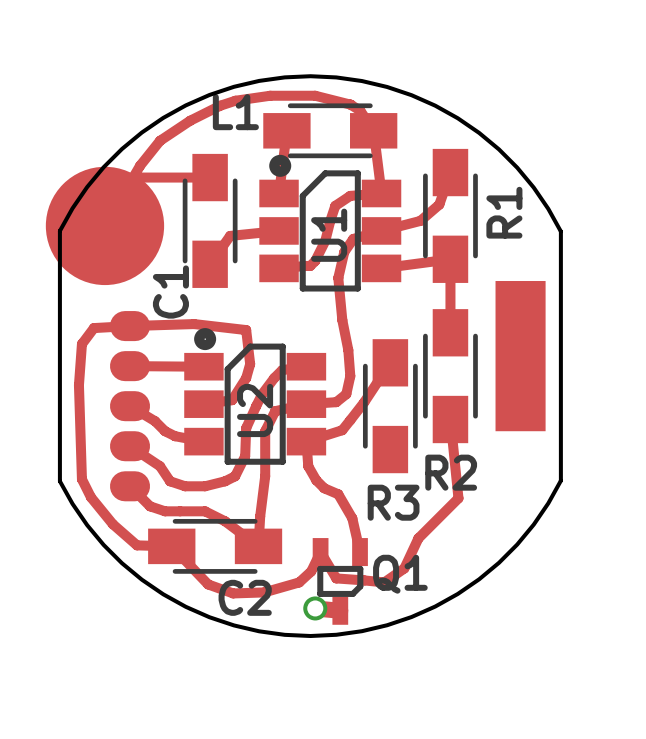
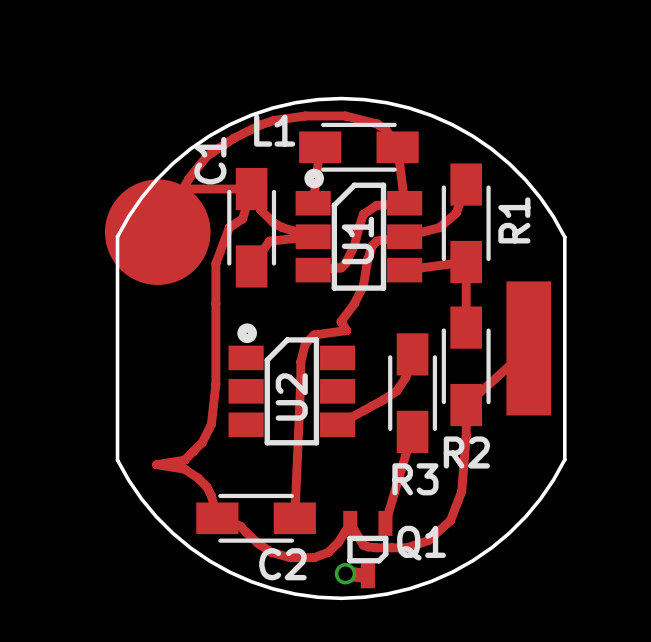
track: none -> (313, 236) (273, 223) (260, 209) (251, 189) (242, 218) (229, 227) (215, 263) (215, 384) (211, 424) (202, 442) (184, 460) (156, 464) (184, 469) (197, 478) (206, 487) (211, 495) (217, 518) (240, 526) (257, 543) (271, 552) (290, 557) (314, 557) (328, 552) (338, 542) (350, 523) (363, 545) (367, 546) (407, 547) (428, 540) (450, 520) (461, 491) (466, 435) (466, 405) (528, 348)
track: (381, 230) (353, 238) (344, 251) (338, 278) (350, 376) (346, 394) (336, 402) (306, 404) (275, 411) (265, 431) (265, 476) (258, 546) (225, 521) (205, 511) (165, 511) (150, 506) (130, 486) -> (404, 236) (376, 241) (372, 245) (363, 285) (354, 303) (341, 321) (346, 330) (314, 335) (305, 343) (300, 361) (294, 518)
C1 name position: C1 (170, 292) -> C1 (210, 160)
part: (130, 326) -> none
track: (390, 362) (364, 402) (342, 430) (306, 441) (308, 466) (316, 480) (324, 488) (338, 494) (352, 518) (360, 552) -> (412, 431) (385, 523)
track: none -> (412, 354) (405, 377) (396, 390) (346, 419)
track: (130, 366) (203, 366) -> none
part: (130, 366) -> none
track: (306, 366) (282, 370) (262, 394) (246, 428) (245, 456) (235, 476) (225, 481) (205, 486) (185, 486) (170, 481) (160, 466) (130, 446) -> none
track: (203, 404) (232, 400) (246, 378) (250, 364) (246, 330) (194, 324) (93, 328) (81, 344) (78, 385) (81, 479) (90, 497) (112, 524) (137, 545) (171, 546) (208, 584) (233, 593) (264, 592) (299, 582) (311, 571) (320, 552) (336, 578) (384, 582) (404, 568) (418, 538) (458, 498) (450, 419) -> none
track: (130, 406) (175, 436) (203, 441) -> none
part: (130, 406) -> none
part: (130, 446) -> none
part: (130, 486) -> none

